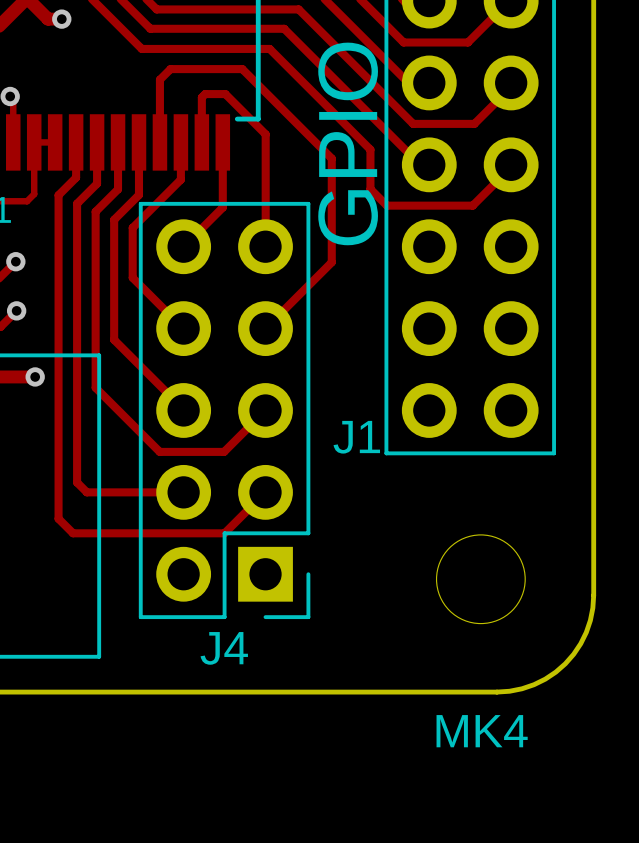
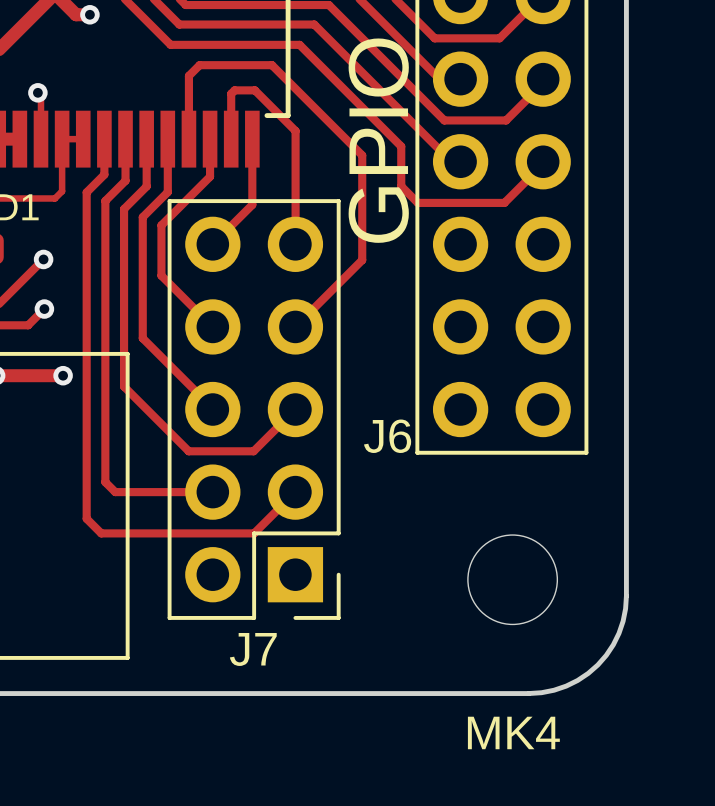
J1 name: J1 (356, 437) -> J6 (387, 436)
J4 name: J4 (224, 648) -> J7 (253, 649)

